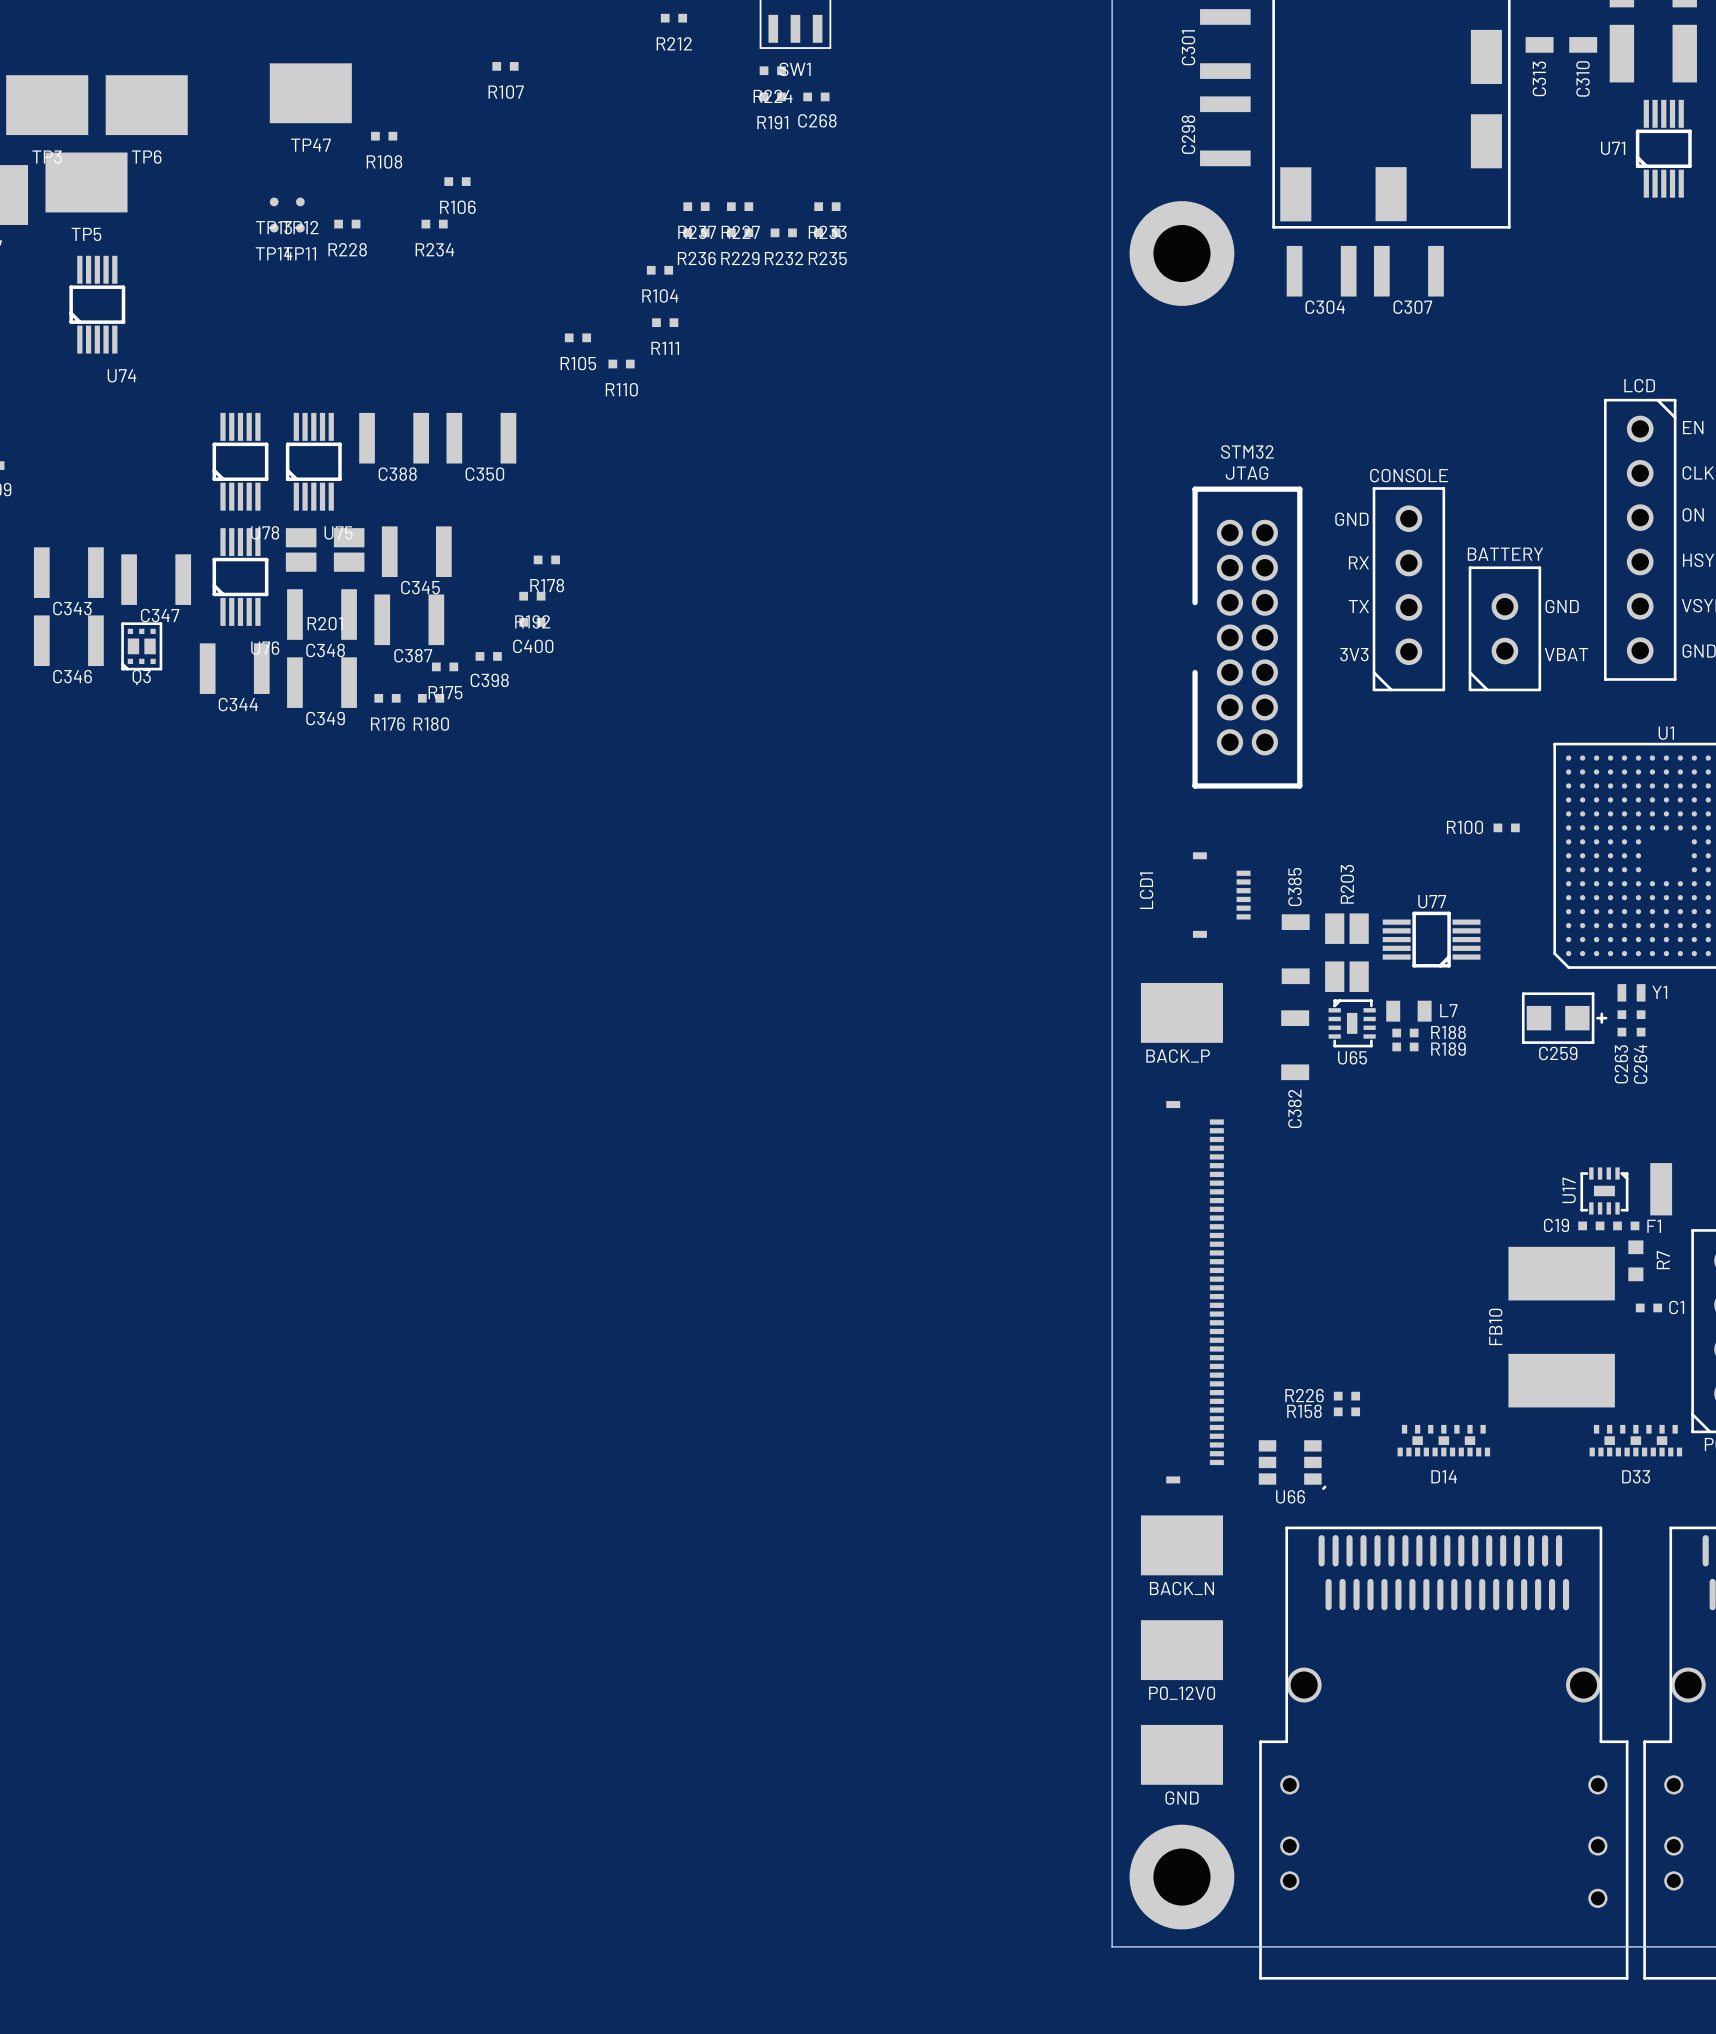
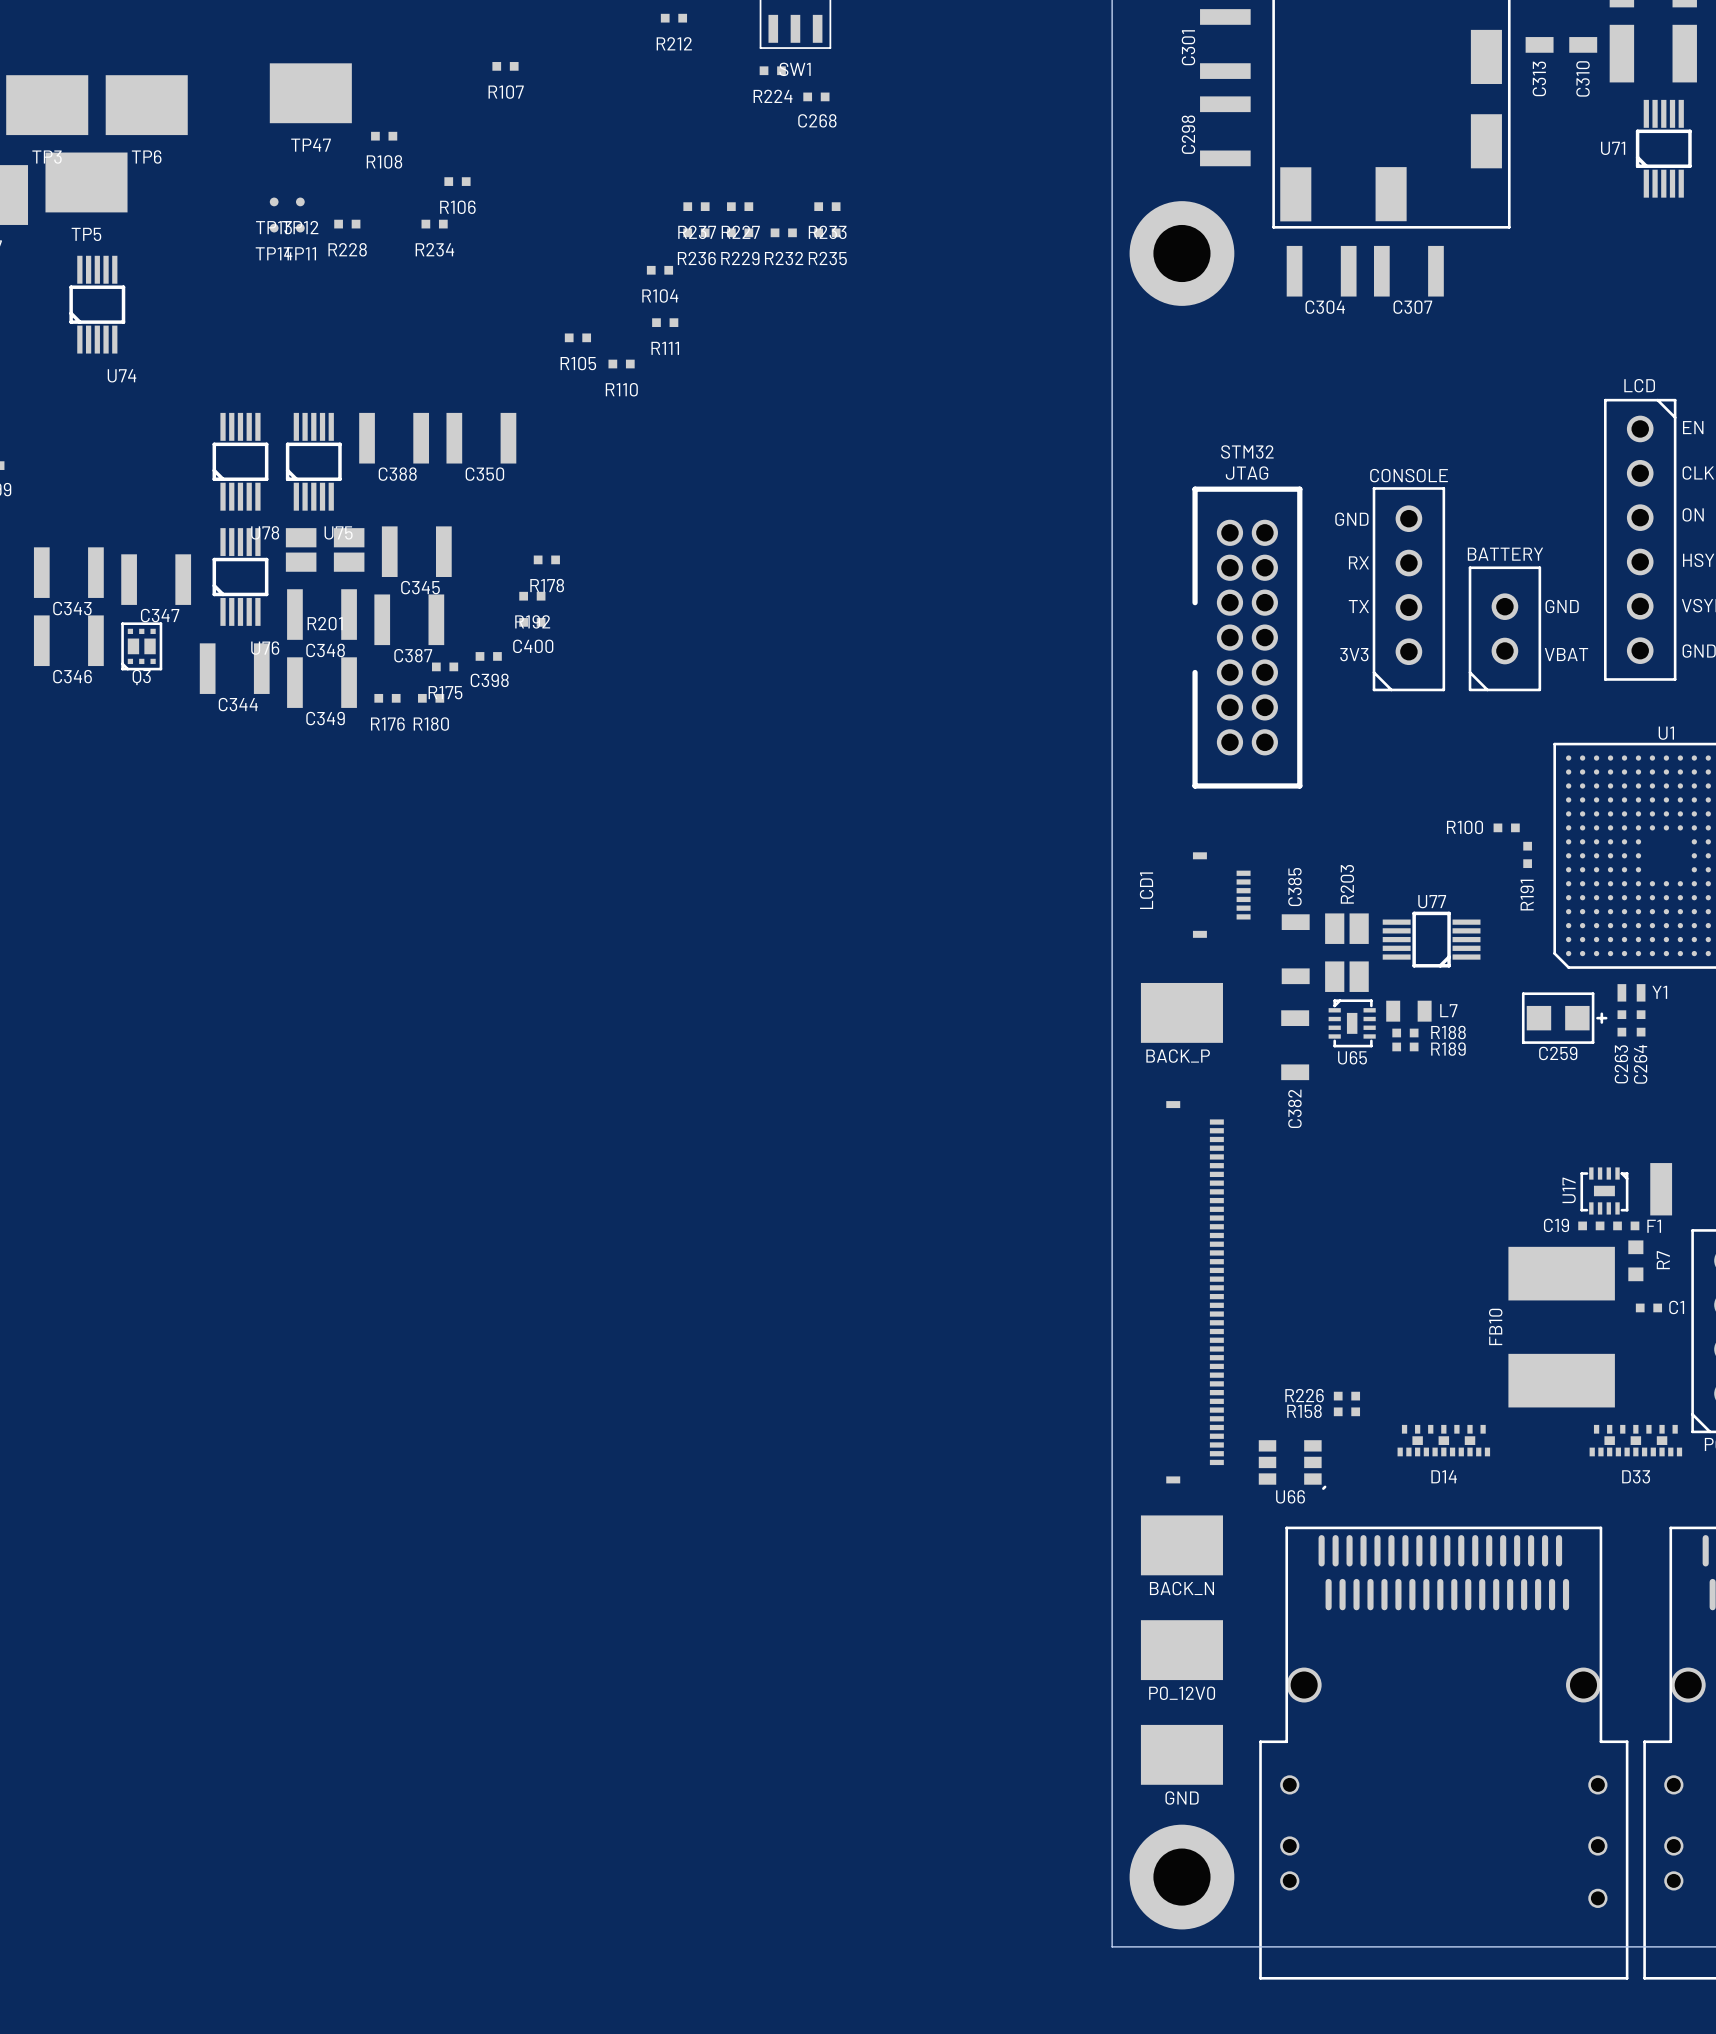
R191 rotation: 0° (772, 96) -> 90° clockwise (1527, 854)
R191 position: (772, 96) -> (1527, 854)

